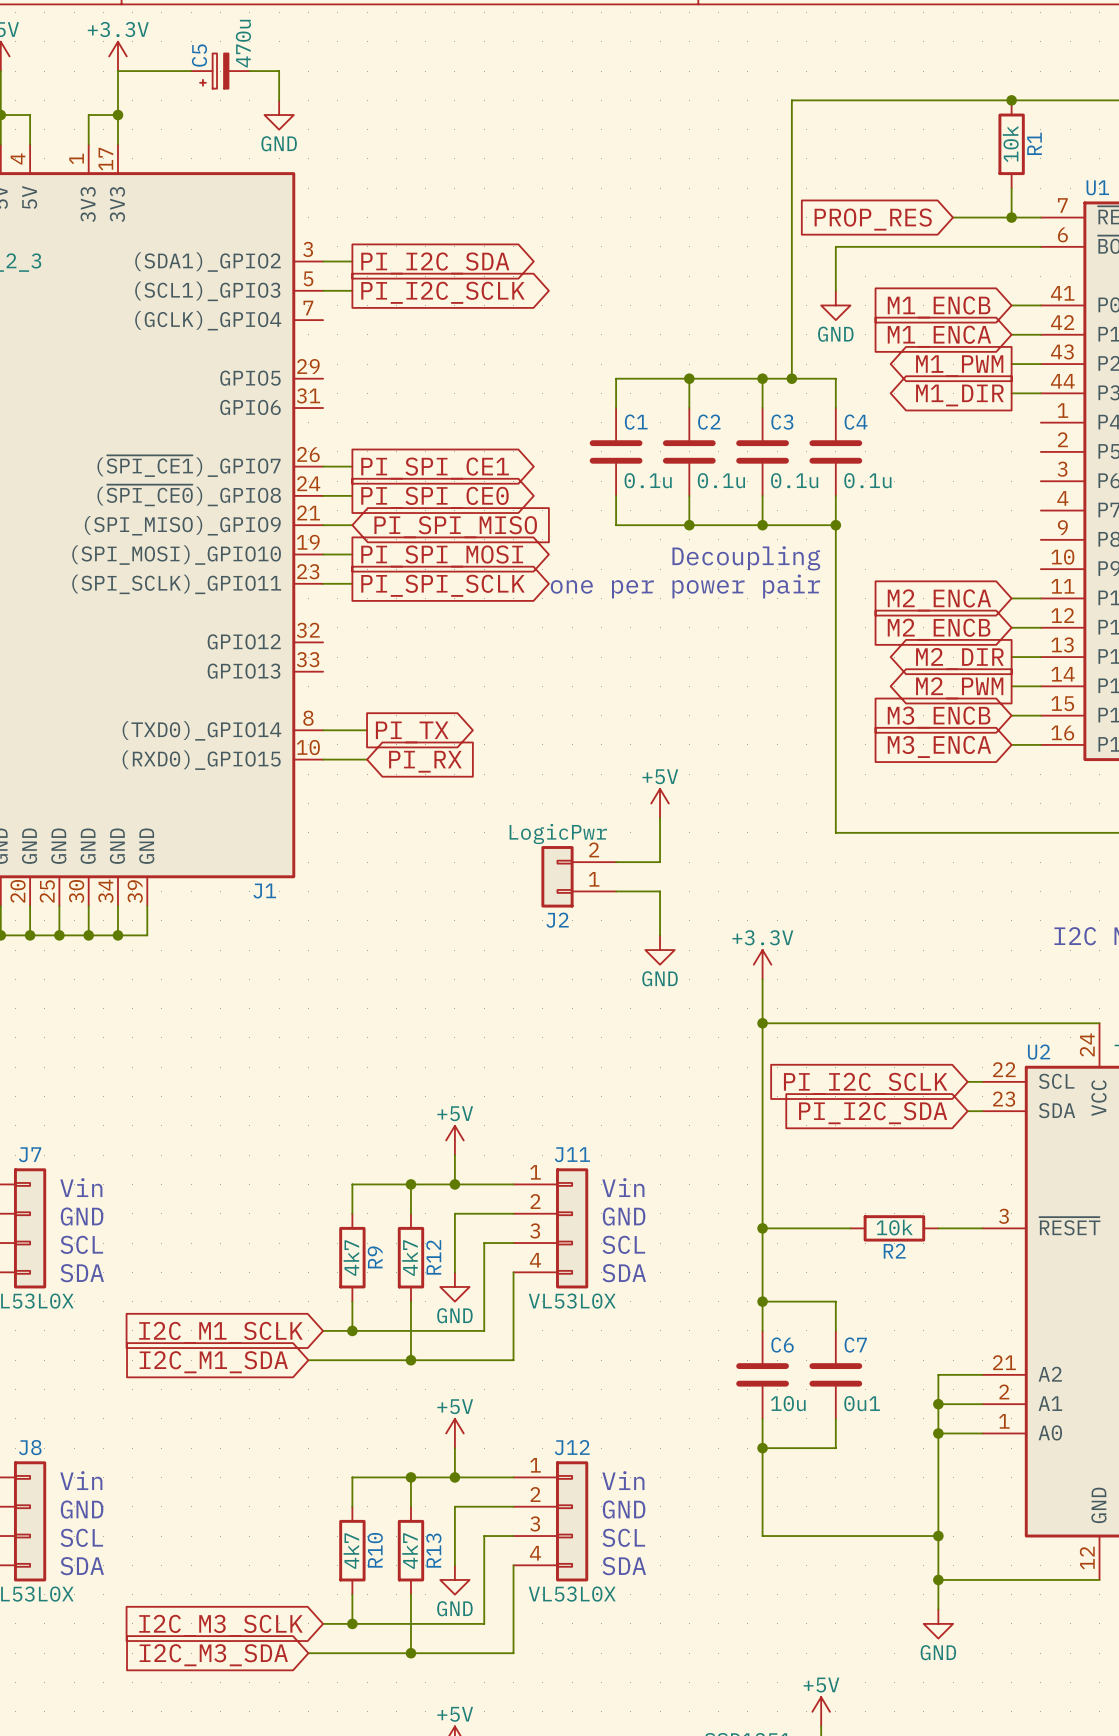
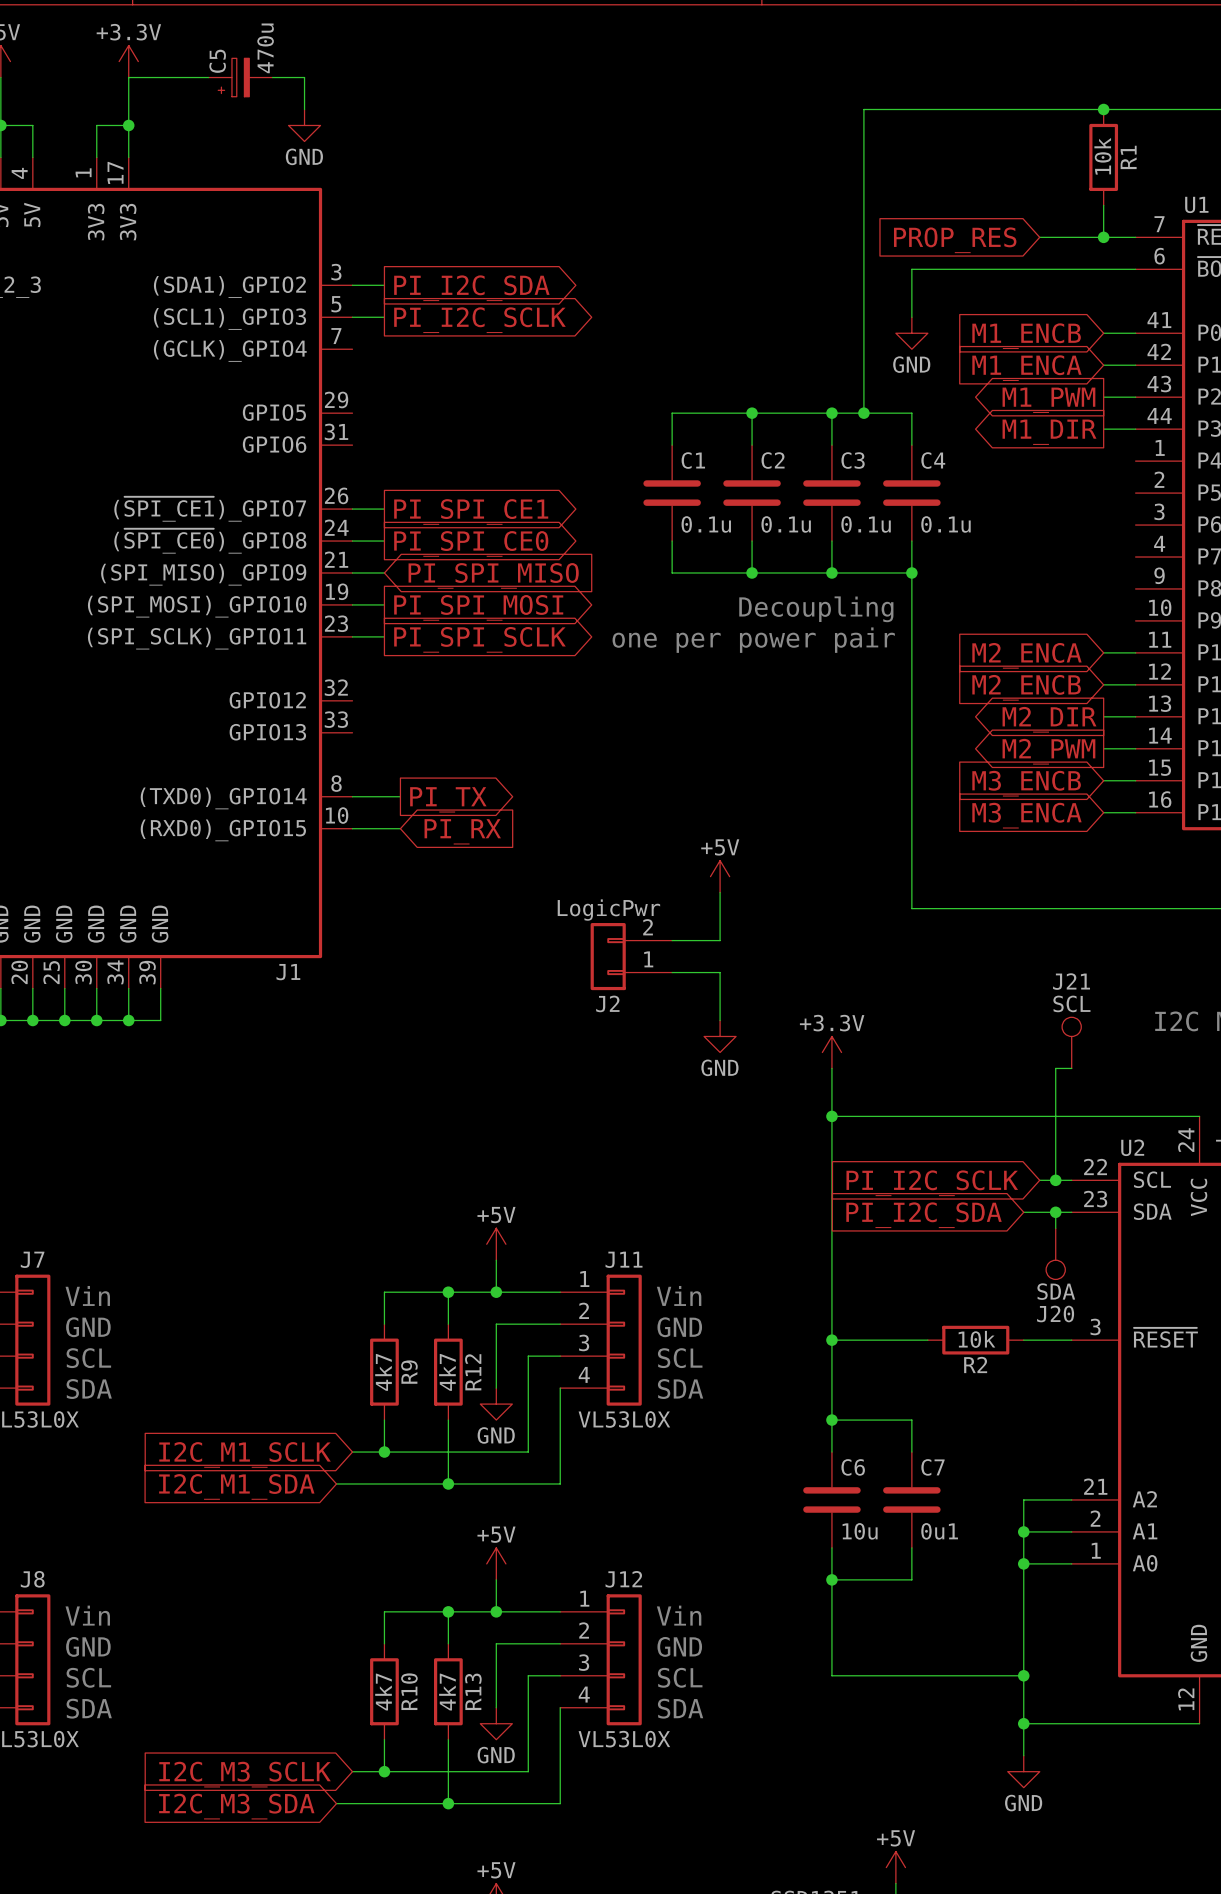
J21: none -> SCL (1071, 1042)
wire: none -> (1071, 1068) (1055, 1068) (1055, 1180) (1039, 1180)
junction: none -> (1055, 1180)
global label position: PI_I2C_SCLK (865, 1083) -> PI_I2C_SCLK (932, 1183)
wire: none -> (1023, 1212) (1055, 1212) (1055, 1228)
junction: none -> (1055, 1212)
global label position: PI_I2C_SDA (873, 1113) -> PI_I2C_SDA (924, 1215)
J20: none -> SDA (1055, 1253)

